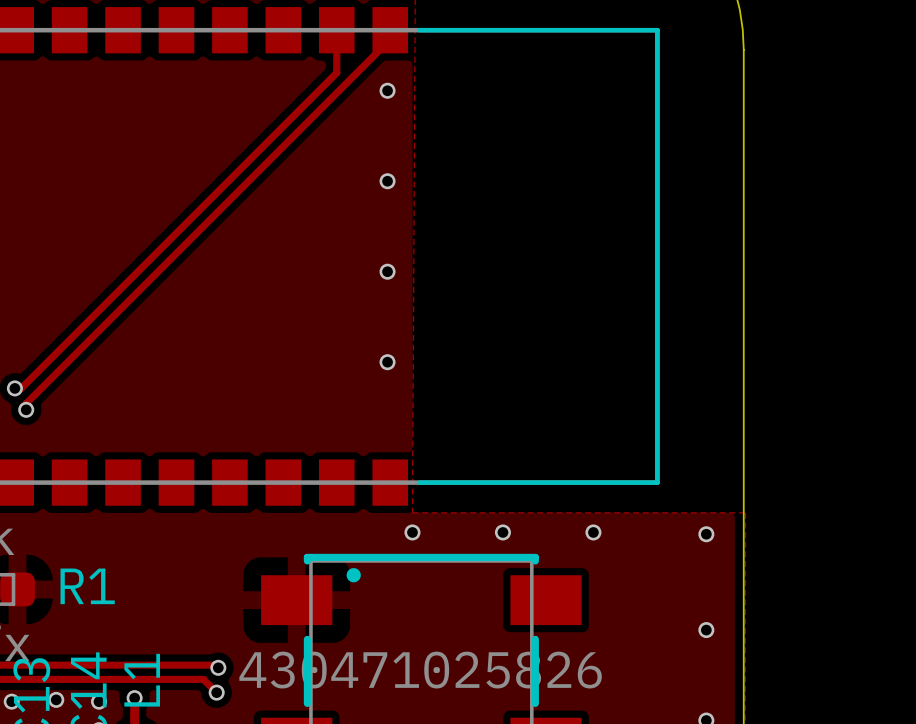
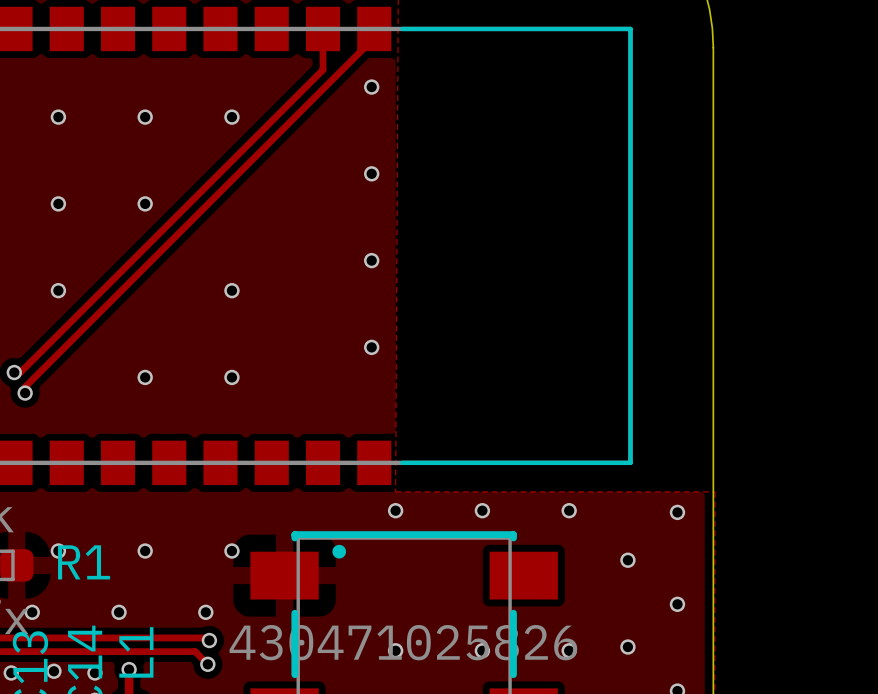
via: none -> (58, 117)
via: none -> (145, 117)
via: none -> (231, 117)
via: none -> (58, 203)
via: none -> (145, 203)
via: none -> (58, 290)
via: none -> (231, 290)
via: none -> (145, 377)
via: none -> (231, 377)
via: none -> (58, 551)
via: none -> (145, 551)
via: none -> (231, 551)
via: none -> (627, 560)
via: none -> (32, 612)
via: none -> (119, 612)
via: none -> (205, 612)
via: none -> (627, 647)
via: none -> (395, 650)
via: none -> (482, 650)
via: none -> (569, 650)

